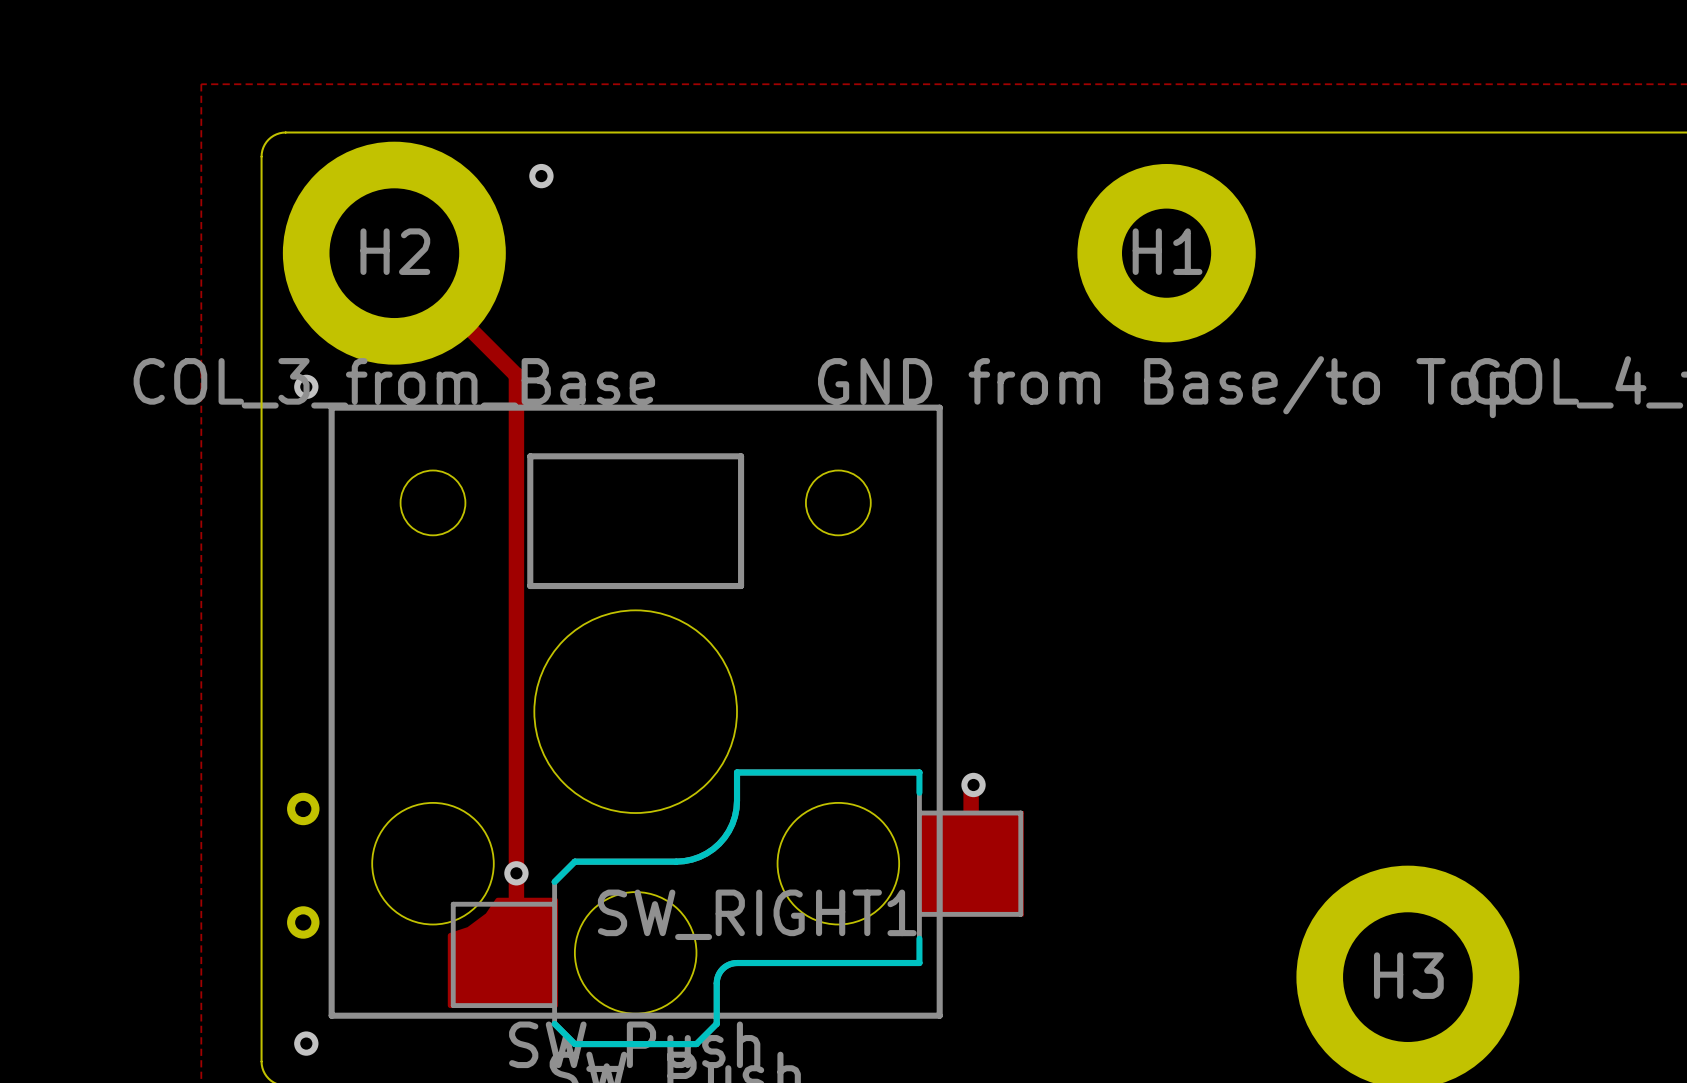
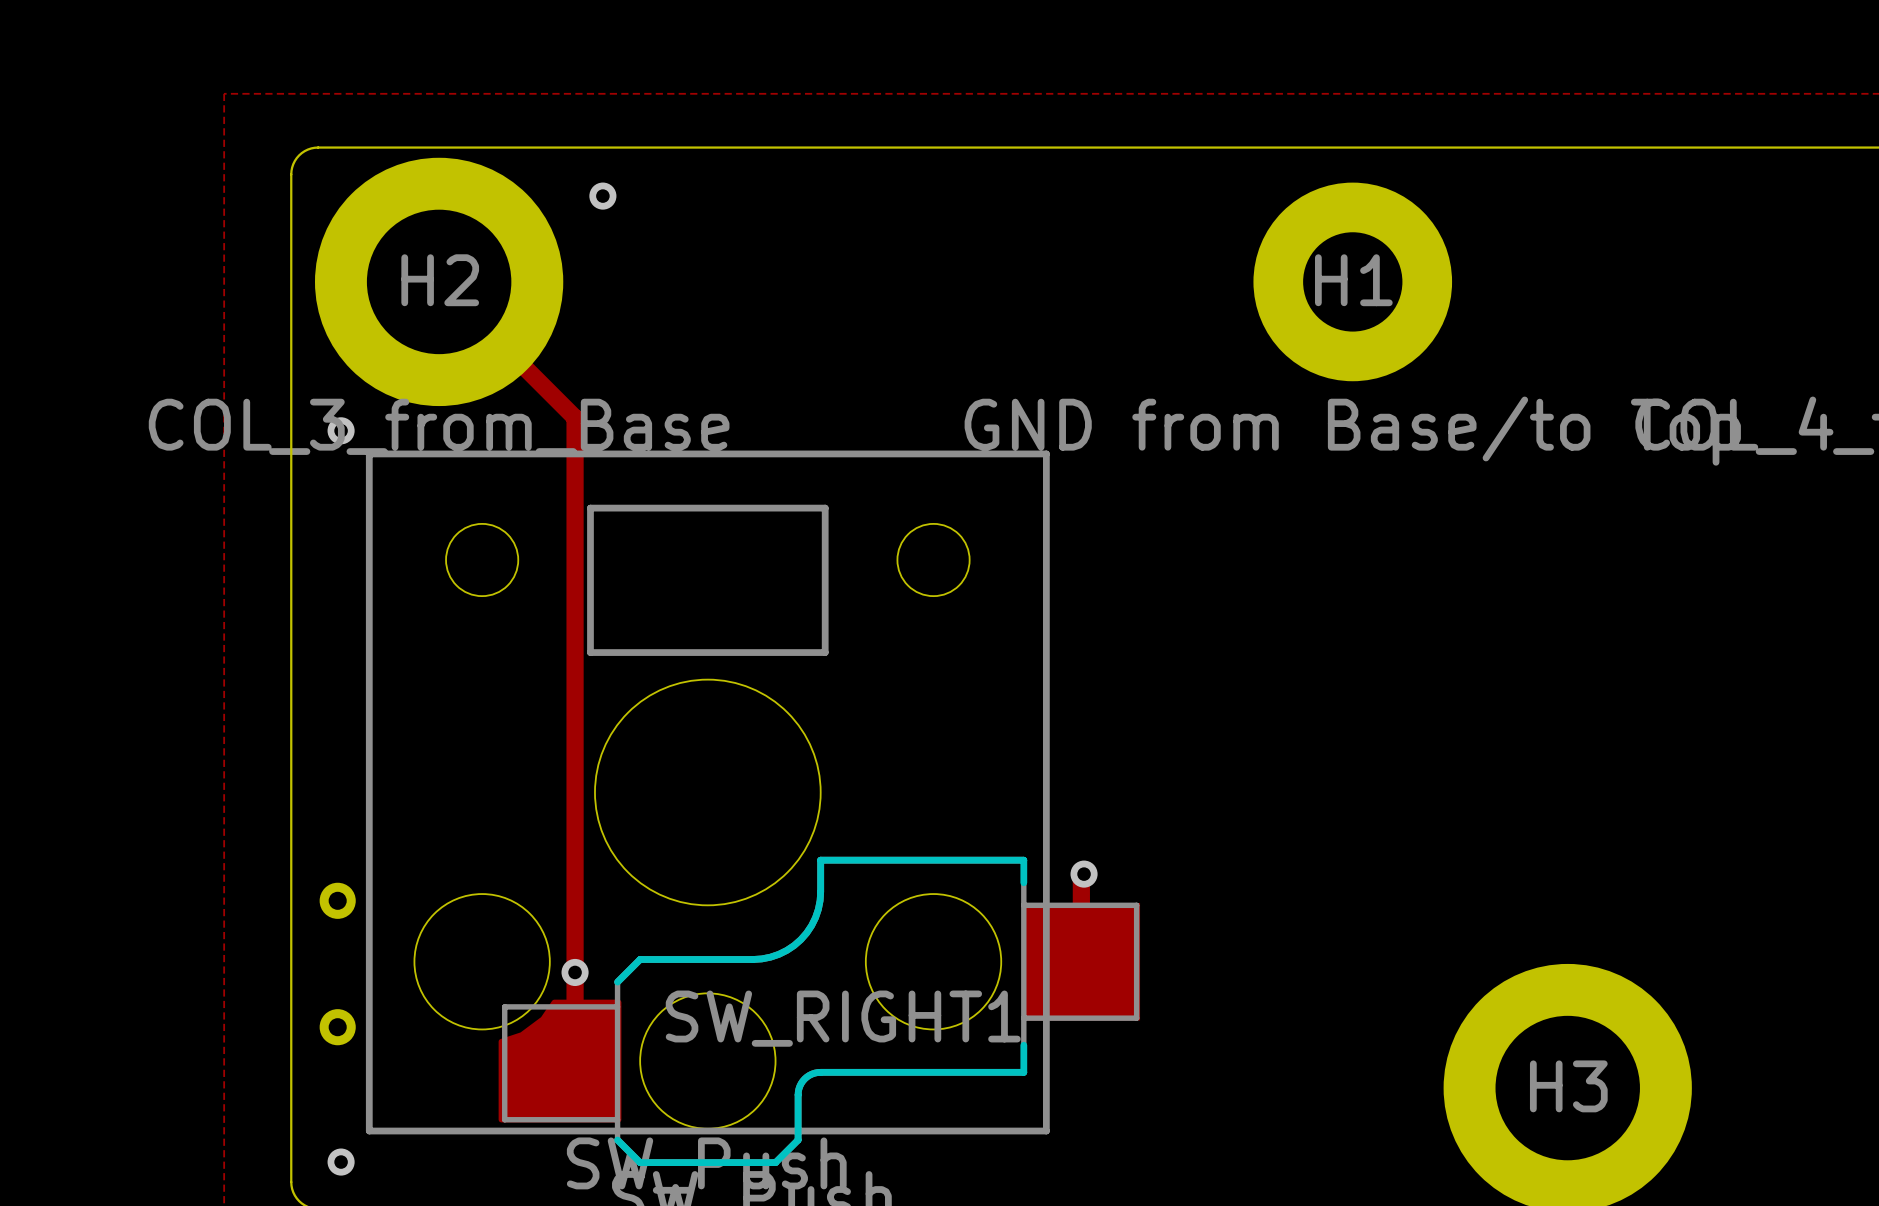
H1 position: (1166, 253) -> (1352, 281)

